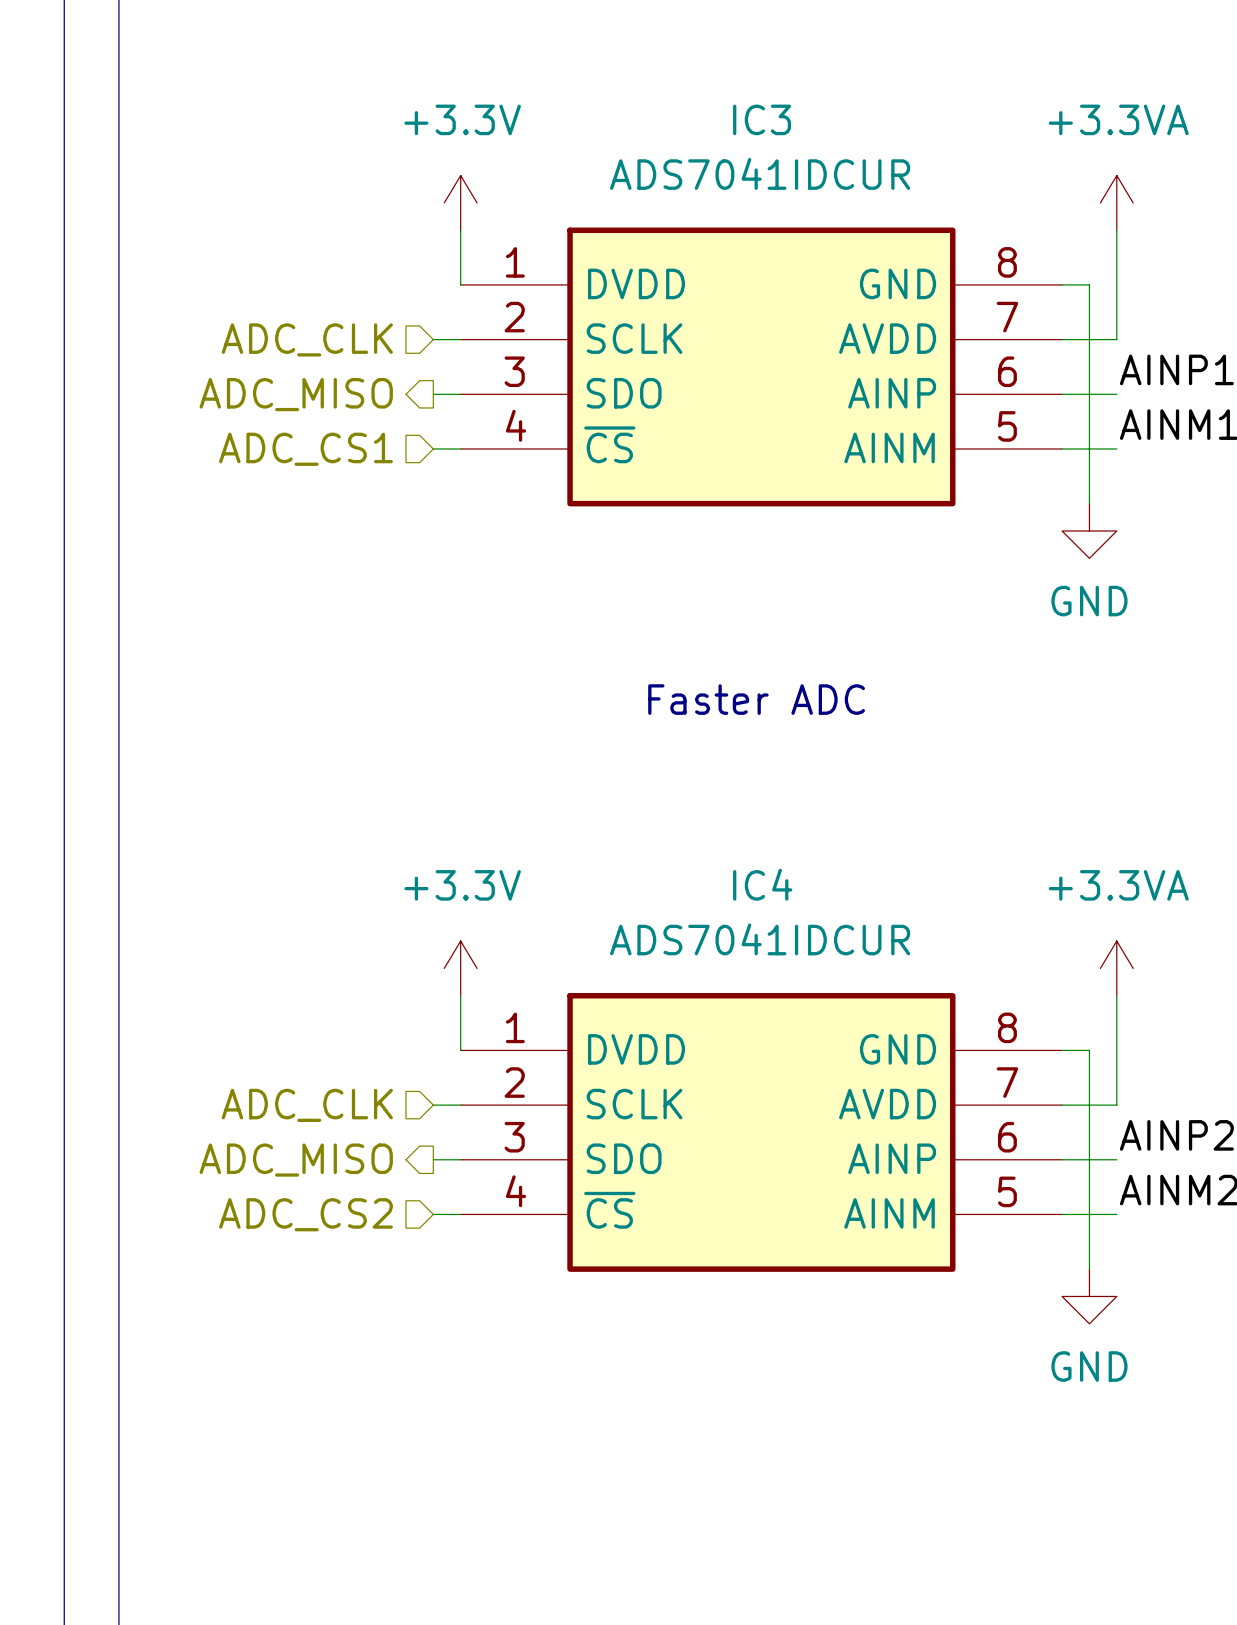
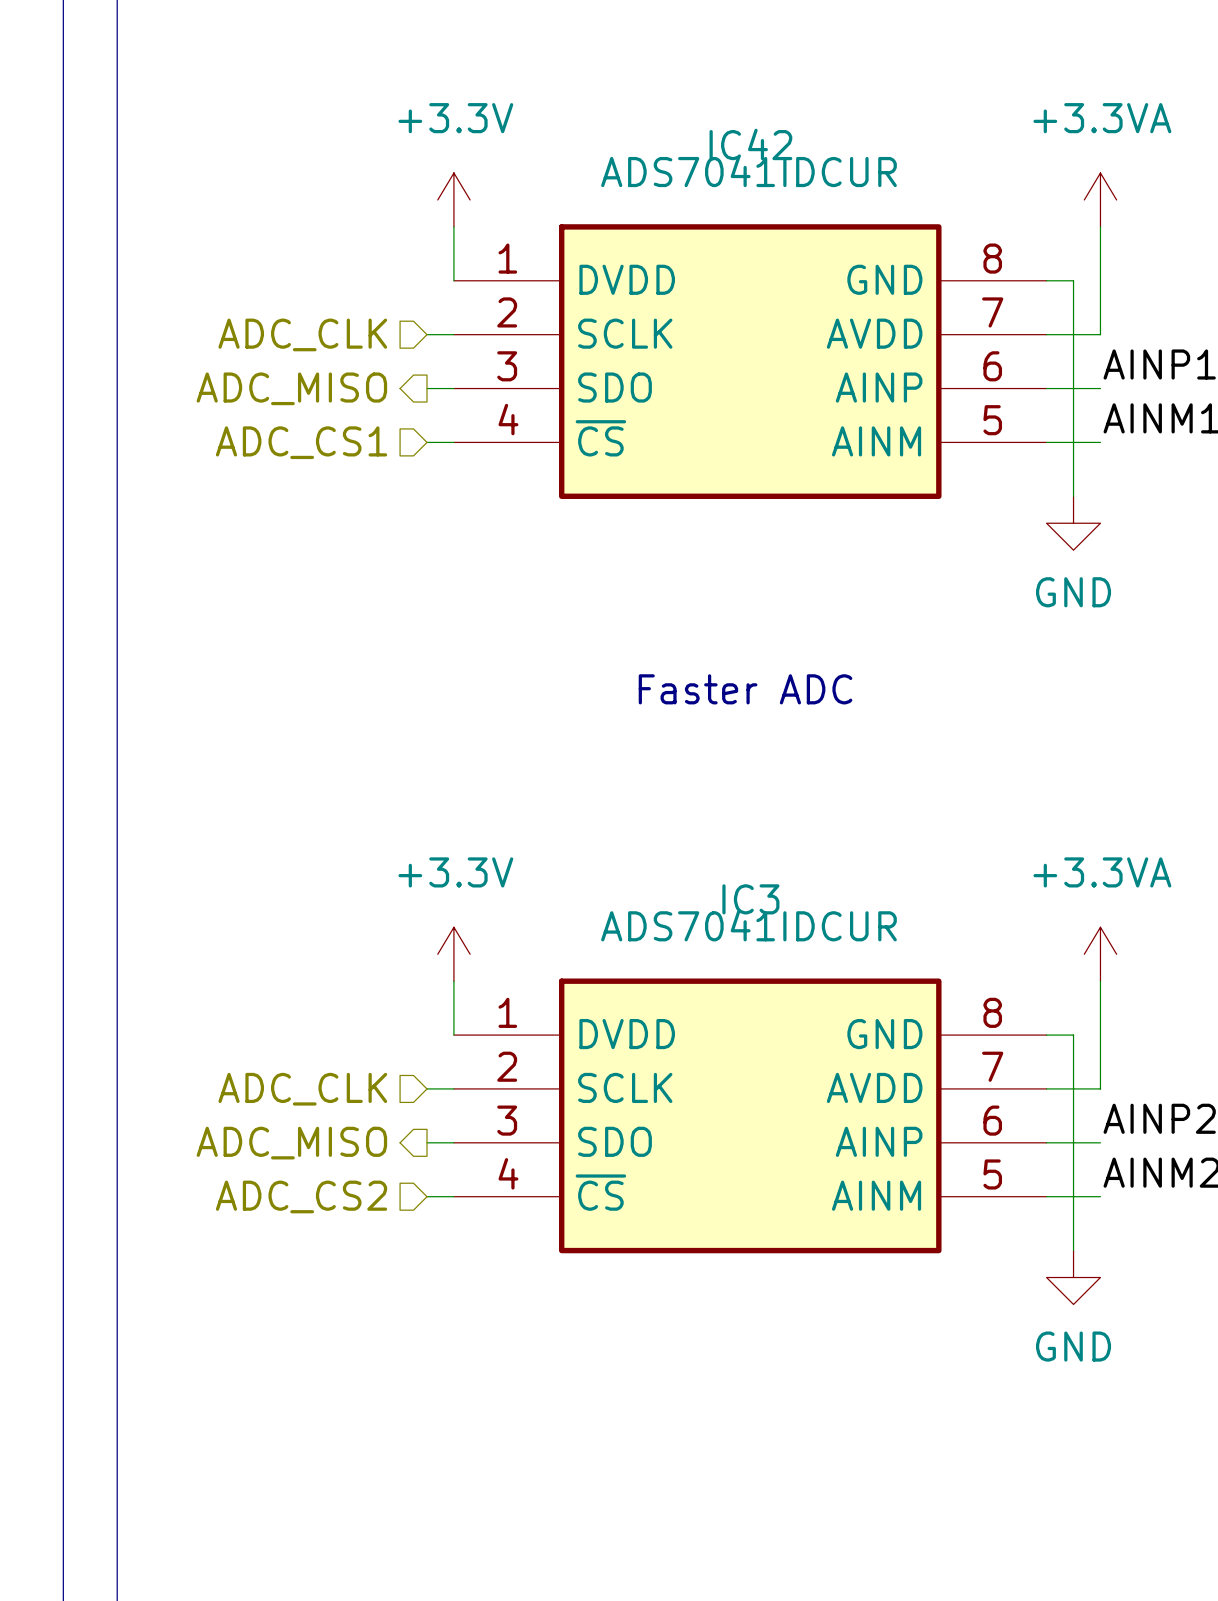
IC3 name: IC3 (762, 119) -> IC42 (750, 144)
IC4 name: IC4 (762, 884) -> IC3 (750, 899)

